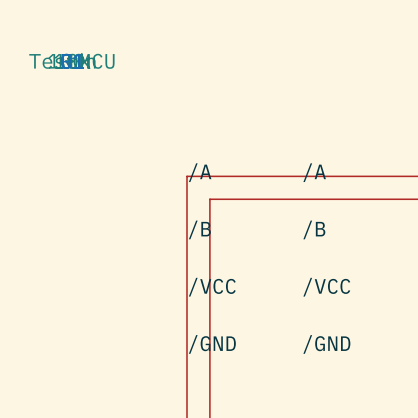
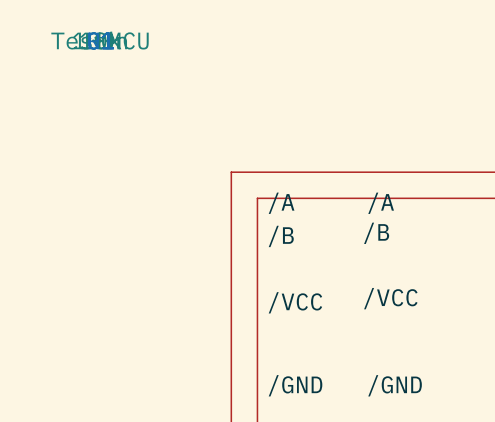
label position: /A (200, 172) -> /A (281, 203)
label position: /A (314, 172) -> /A (381, 203)
label position: /B (199, 229) -> /B (281, 236)
label position: /VCC (212, 287) -> /VCC (295, 302)
label position: /GND (212, 344) -> /GND (295, 385)
label position: /GND (326, 344) -> /GND (395, 385)

